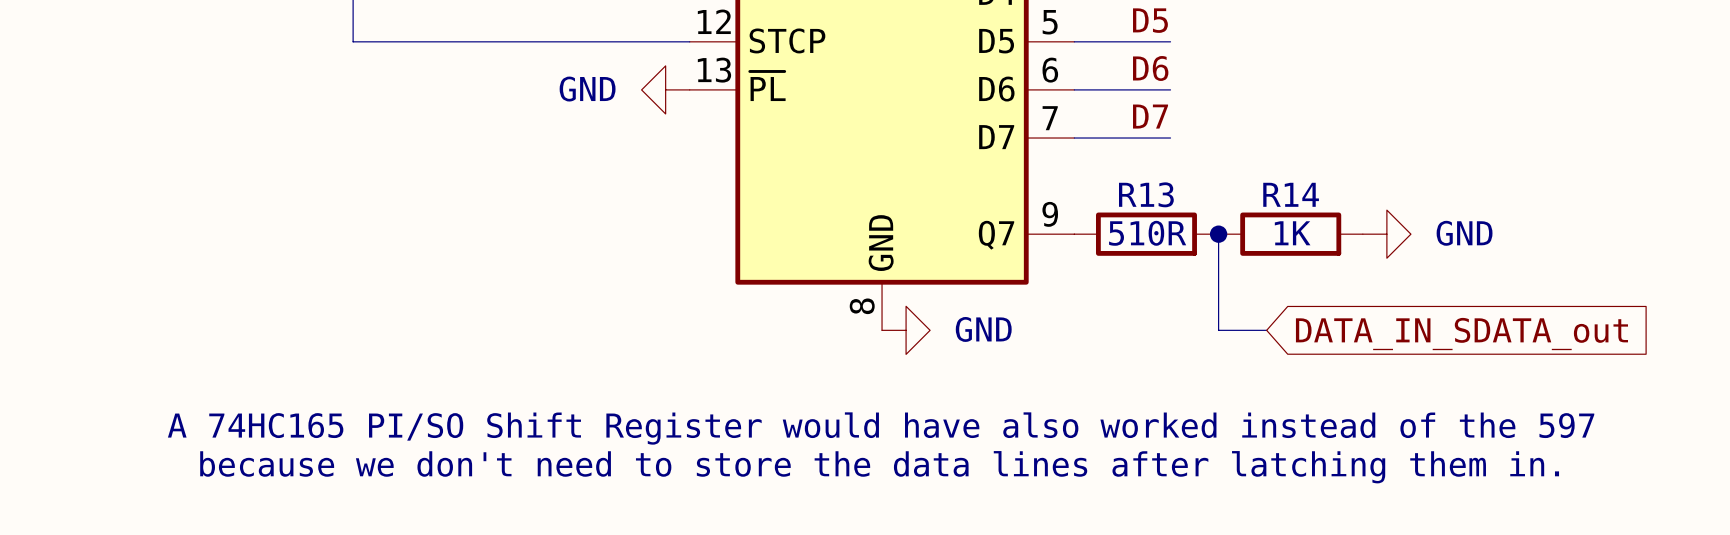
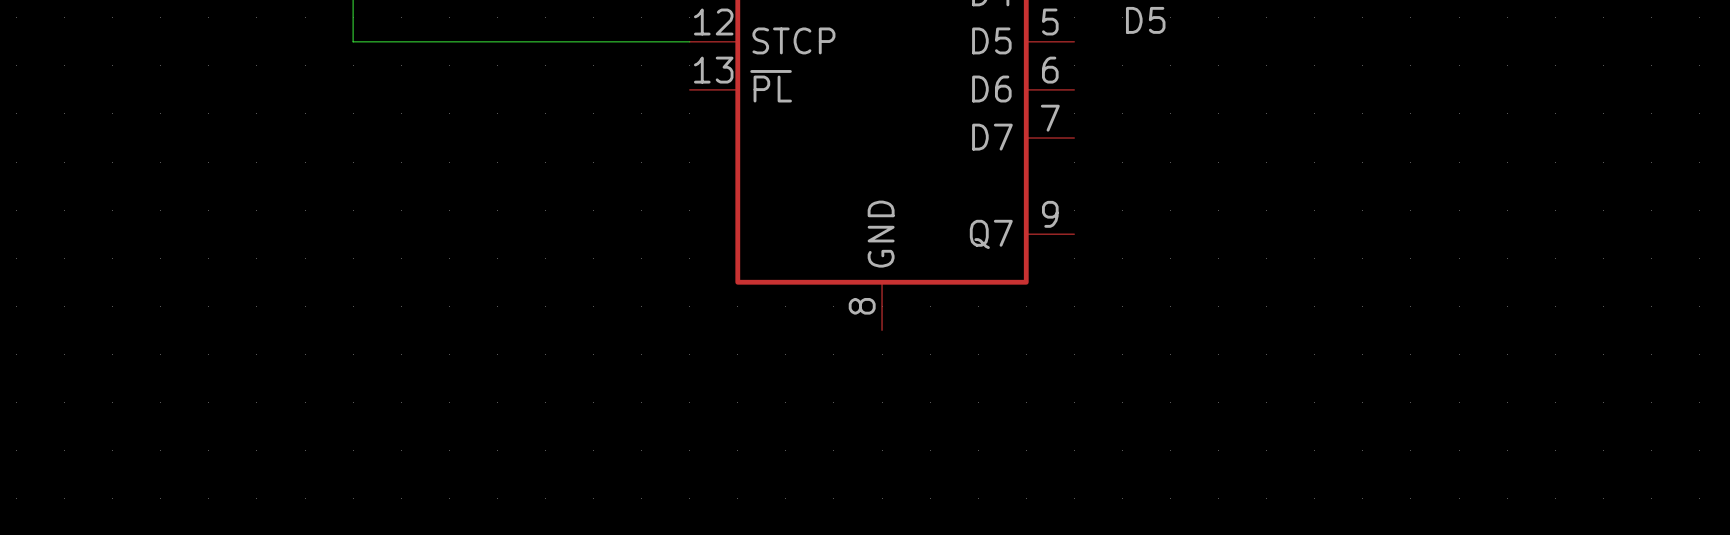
wire: (1074, 41) (1170, 41) -> none
label: D6 (1150, 68) -> none
power symbol: GND (665, 89) -> none
wire: (1074, 89) (1170, 89) -> none
label: D7 (1150, 116) -> none
wire: (1074, 138) (1170, 138) -> none
R13: 510R (1146, 234) -> none
wire: (1218, 234) (1218, 330) (1266, 330) -> none
junction: (1218, 234) -> none
R14: 1K (1290, 234) -> none
power symbol: GND (1386, 234) -> none
power symbol: GND (906, 330) -> none
global label: DATA_IN_SDATA_out (1461, 334) -> none
text: A 74HC165 PI/SO Shift Register would have also worked instead of the 597 (881, 428) -> none
text: because we don't need to store the data lines after latching them in. (879, 467) -> none

